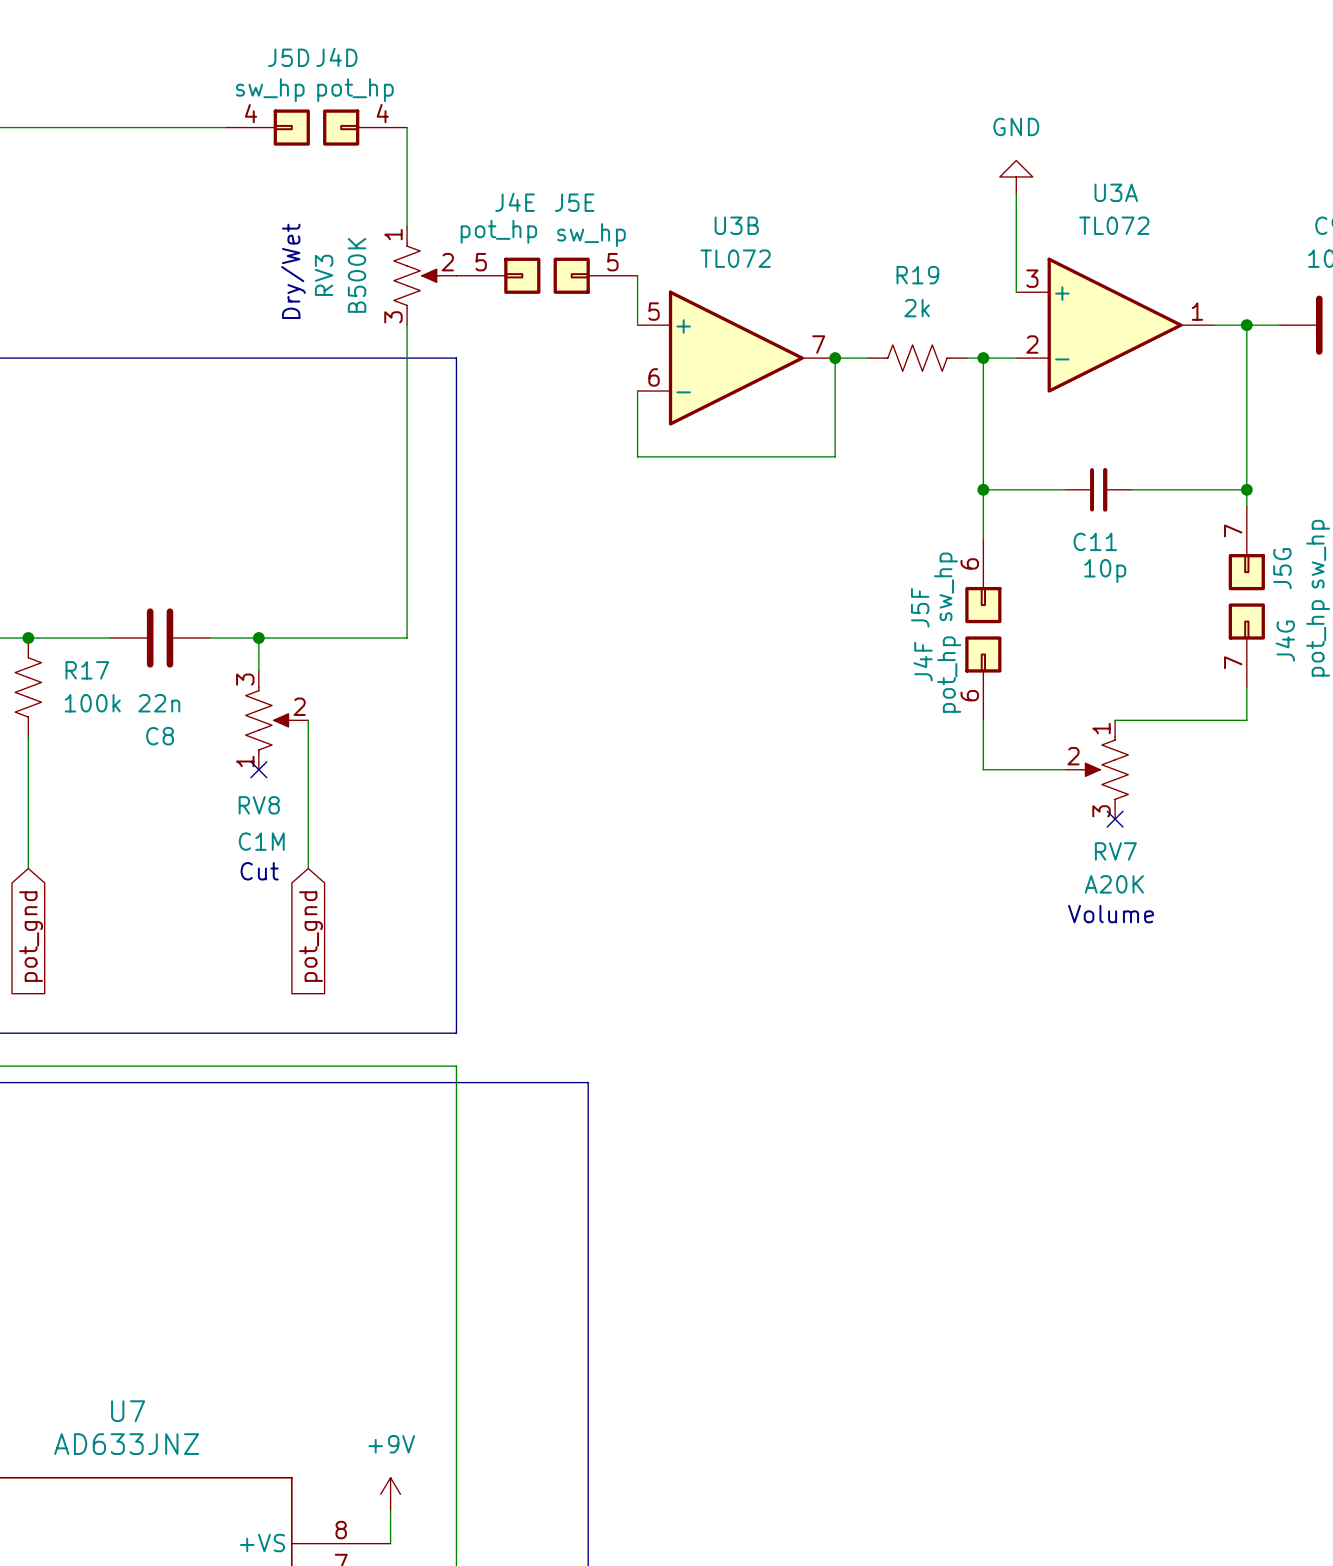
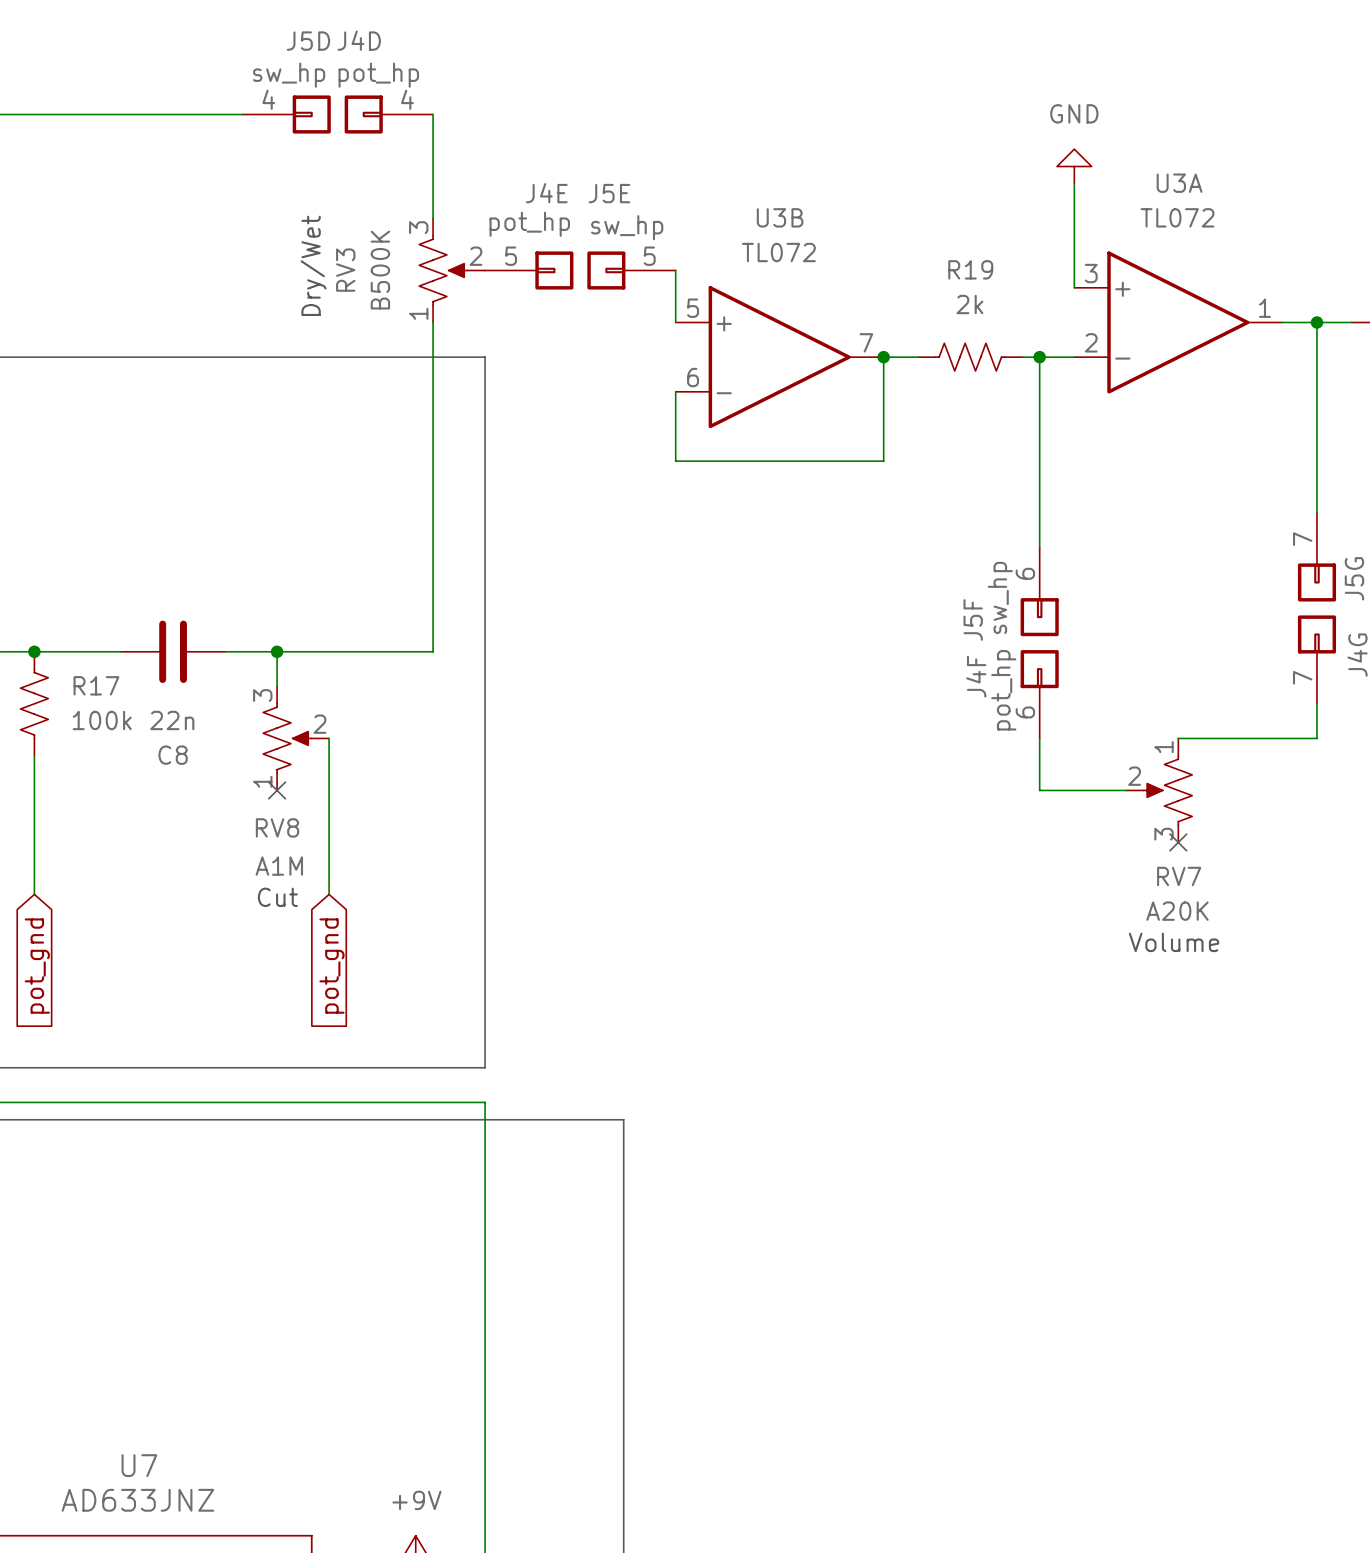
RV3 flip: as is (416, 275) -> up-down (443, 270)
wire: (983, 489) (1065, 489) -> none
junction: (983, 489) -> none
C11: 10p (1098, 489) -> none
wire: (1131, 489) (1246, 489) -> none
junction: (1246, 489) -> none
RV8 value: C1M (261, 841) -> A1M (279, 866)

